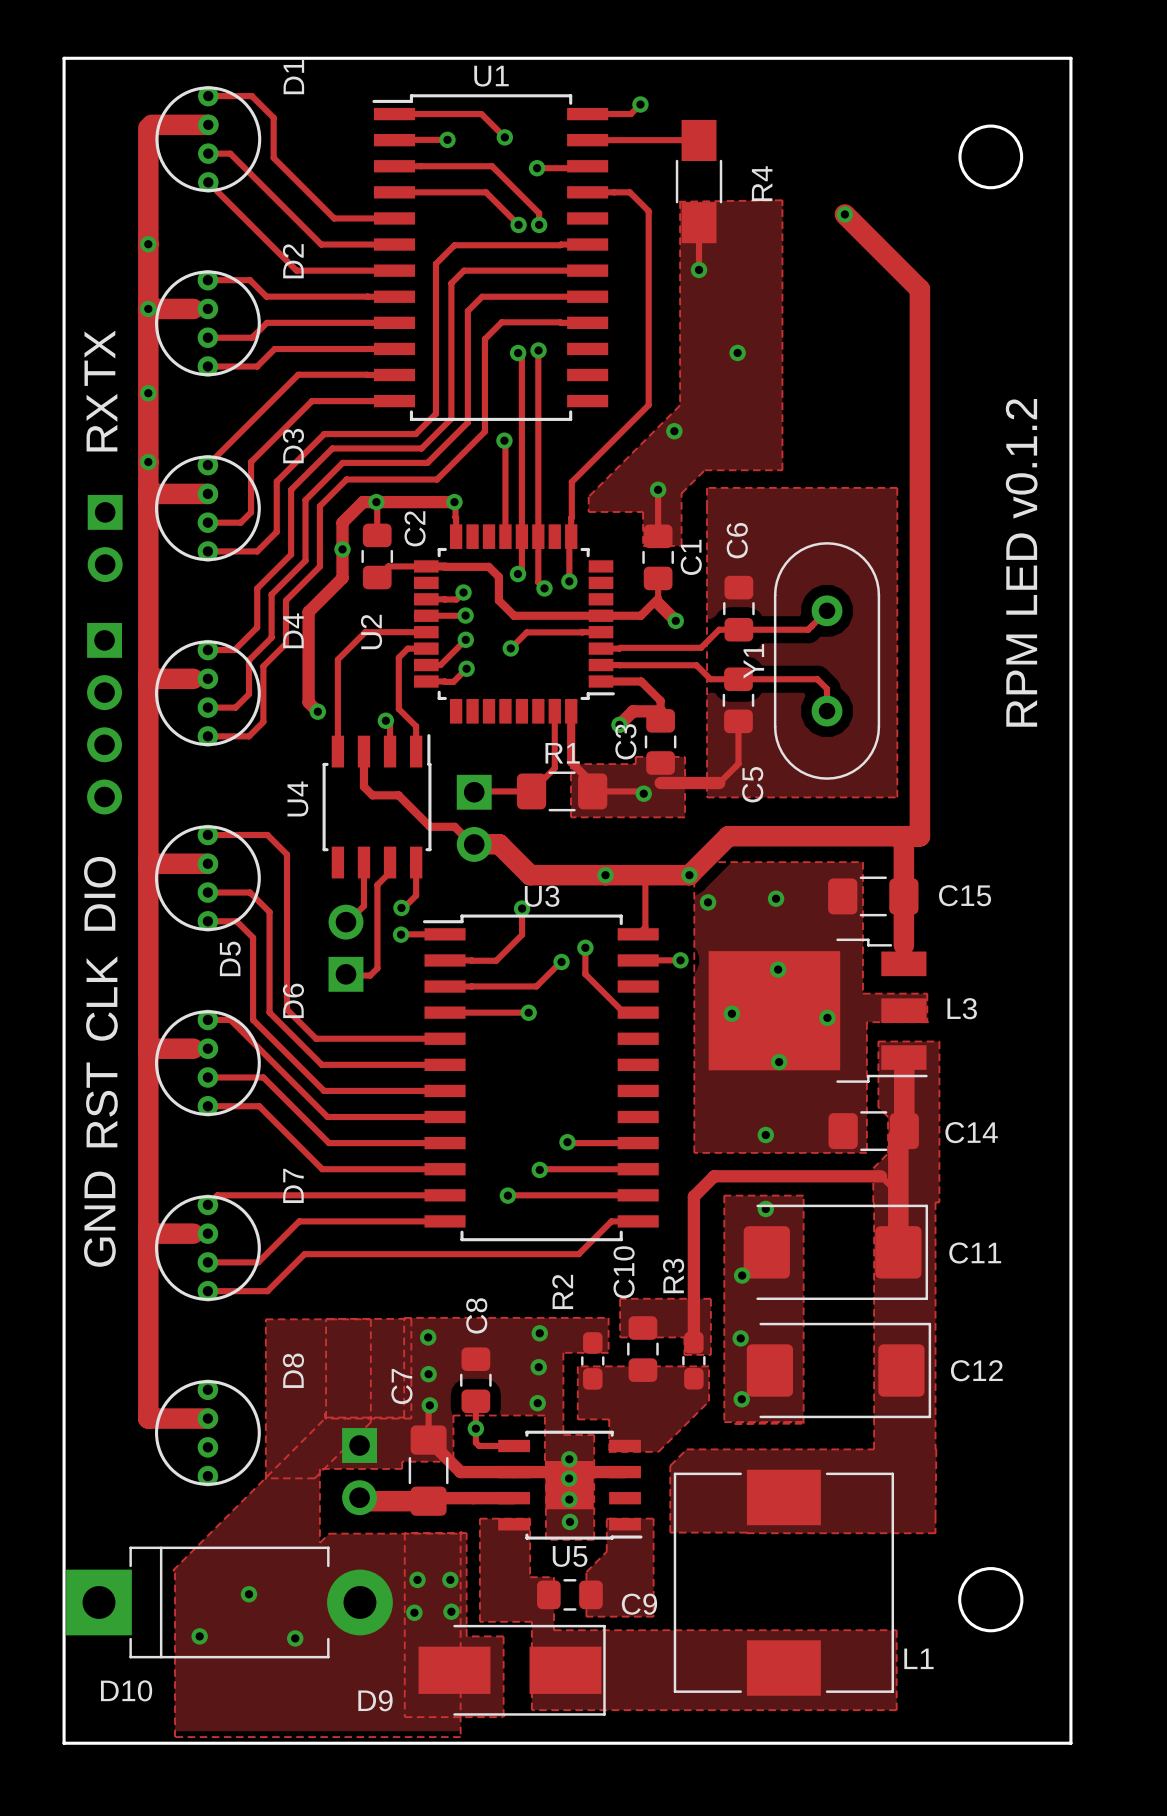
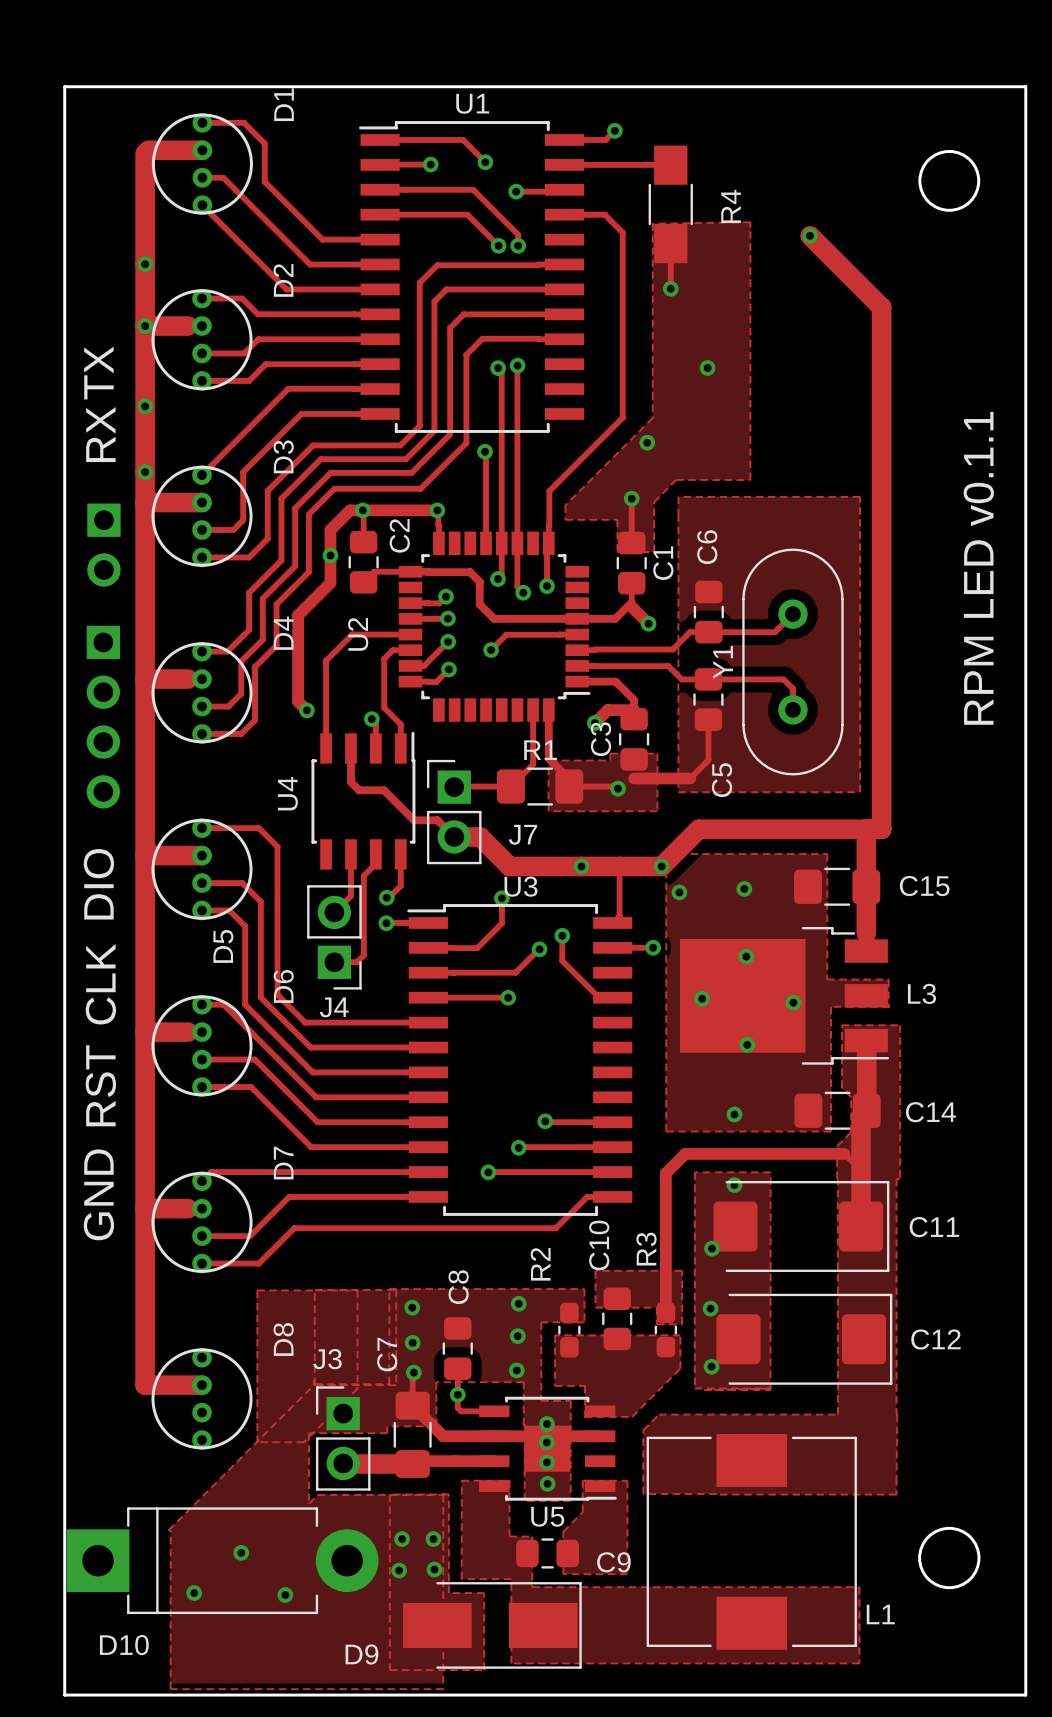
text: RPM LED v0.1.2 (1021, 562) -> RPM LED v0.1.1 (978, 568)
J7 side: bottom (474, 818) -> top (454, 812)
J4 side: bottom (345, 948) -> top (334, 937)
J3 side: bottom (359, 1471) -> top (343, 1438)

